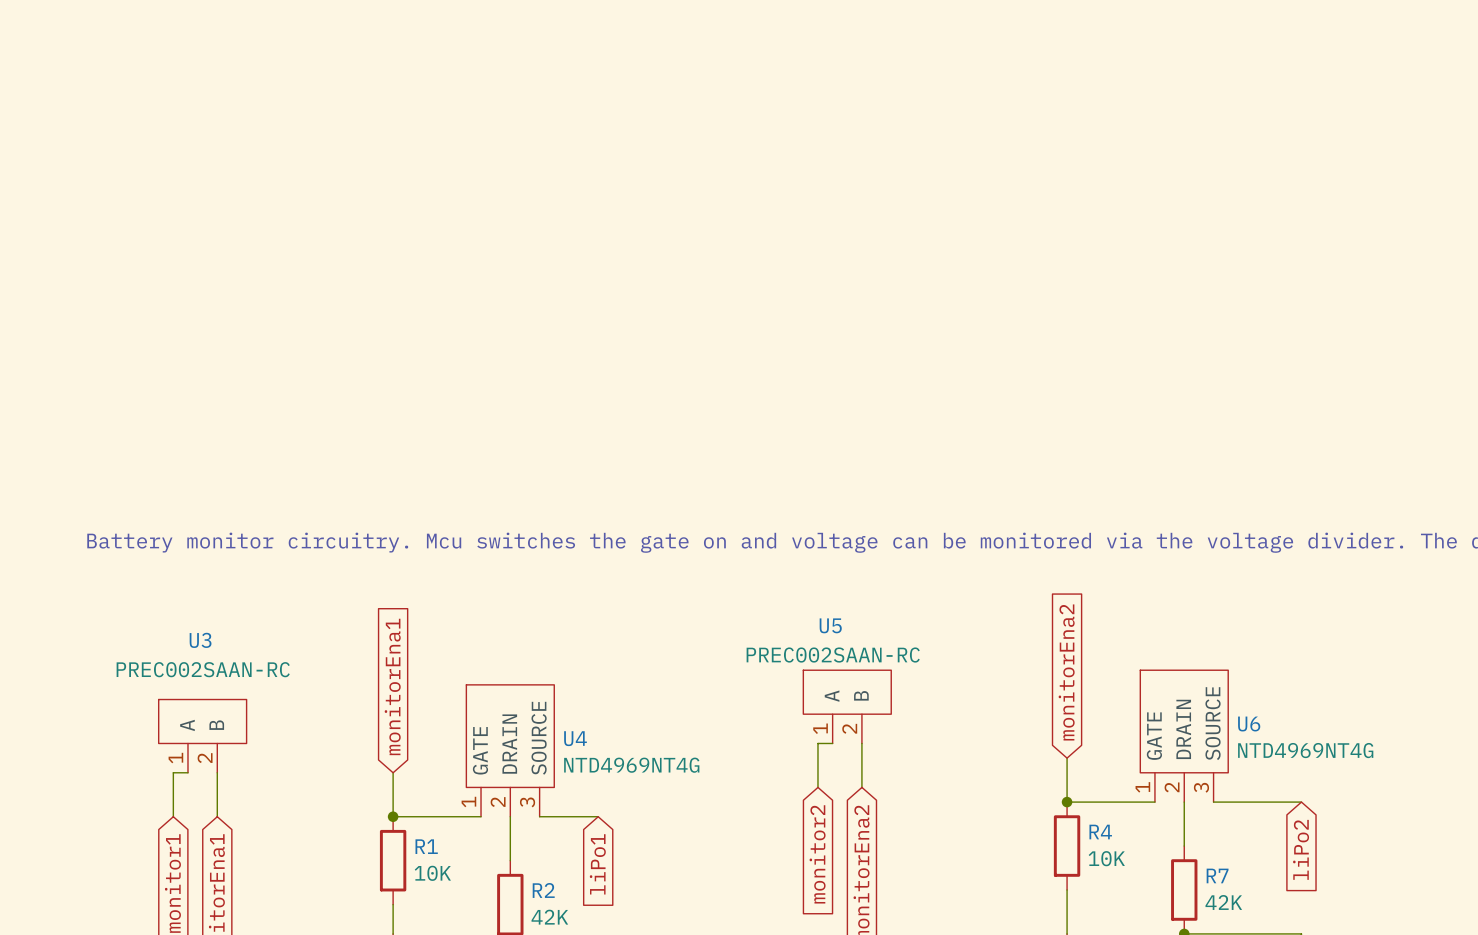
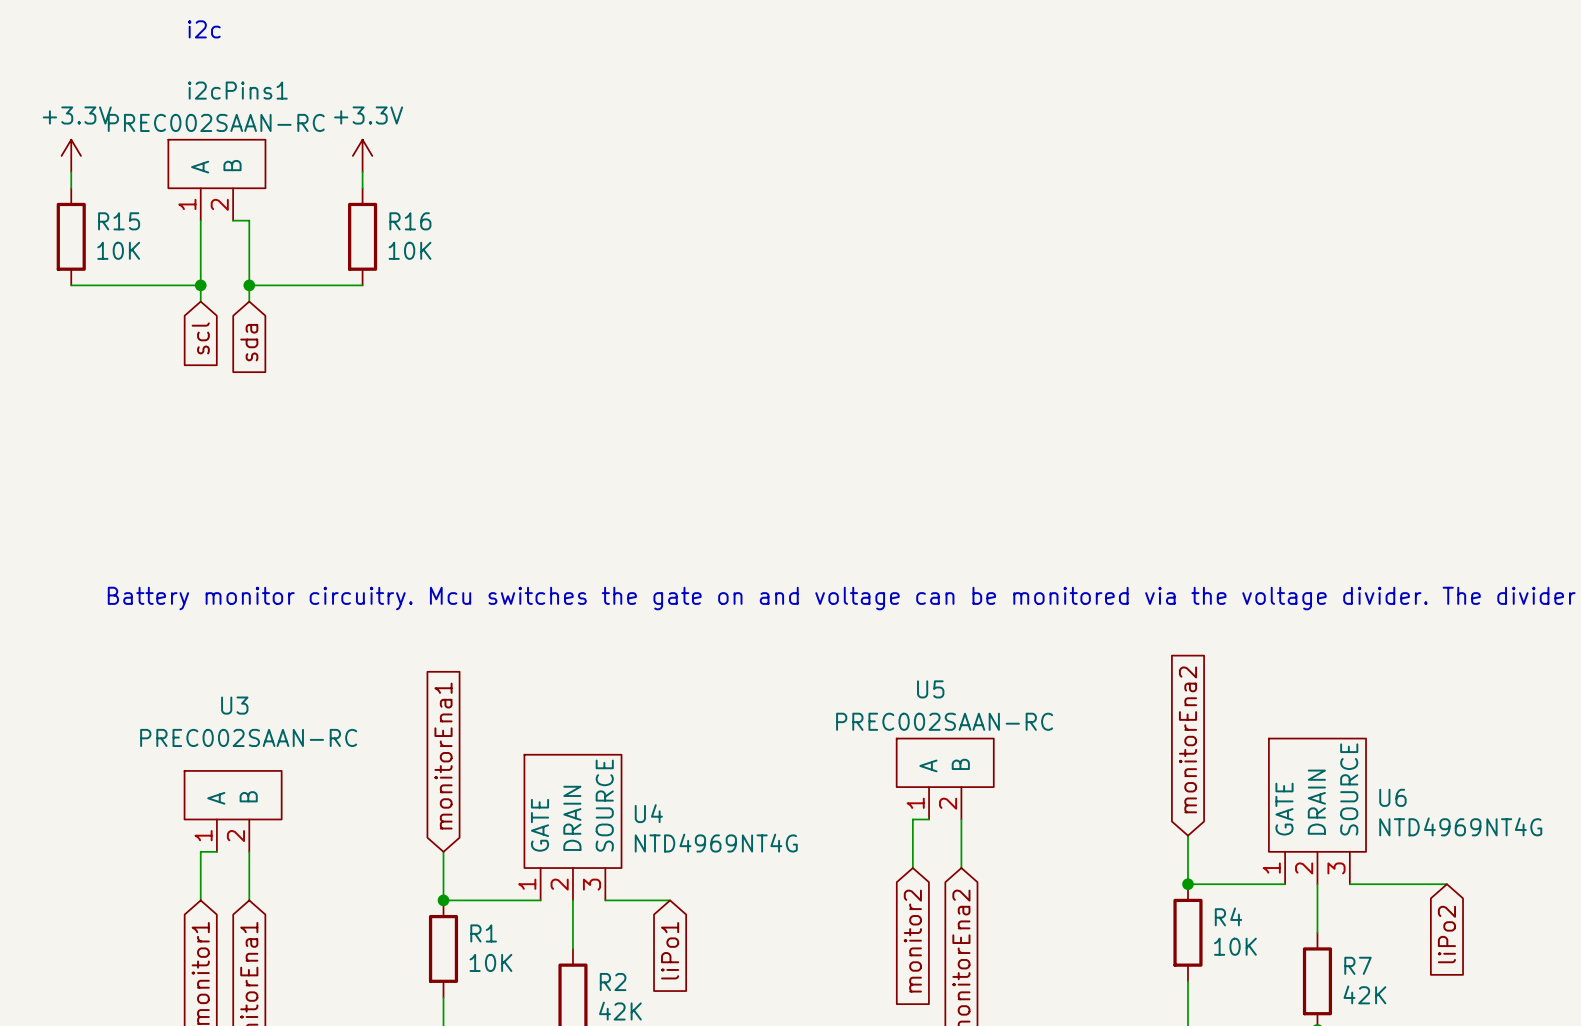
text: none -> i2c (204, 29)
power symbol: none -> +3.3V (71, 155)
power symbol: none -> +3.3V (362, 155)
wire: none -> (71, 172) (71, 188)
wire: none -> (362, 172) (362, 188)
i2cPins1: none -> PREC002SAAN-RC (216, 180)
wire: none -> (200, 220) (200, 301)
wire: none -> (233, 220) (249, 220) (249, 301)
R15: none -> 10K (71, 236)
R16: none -> 10K (362, 236)
wire: none -> (71, 285) (200, 285)
junction: none -> (200, 285)
wire: none -> (249, 285) (362, 285)
junction: none -> (249, 285)
global label: none -> sda (249, 342)
global label: none -> scl (200, 338)

